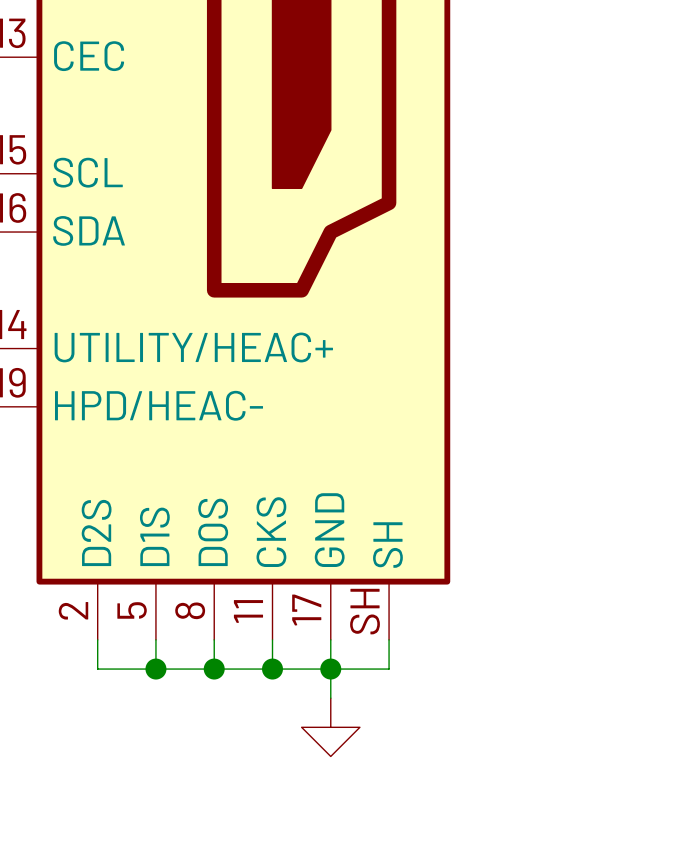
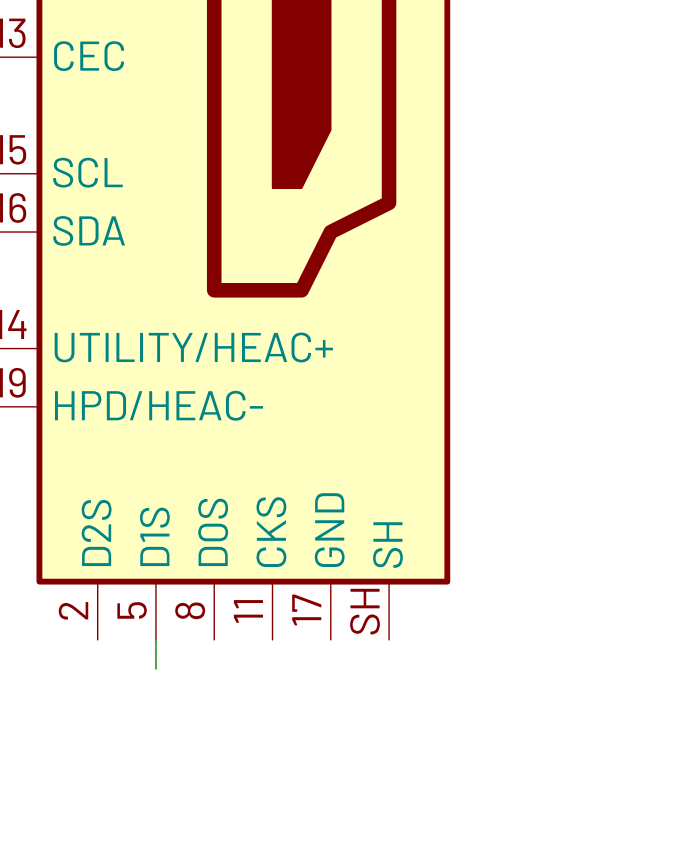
wire: (97, 639) (97, 669) (389, 669) (389, 639) -> none
wire: (214, 639) (214, 669) -> none
wire: (272, 639) (272, 669) -> none
wire: (330, 639) (330, 698) -> none
junction: (155, 669) -> none
junction: (214, 669) -> none
junction: (272, 669) -> none
junction: (330, 669) -> none
power symbol: (330, 727) -> none

